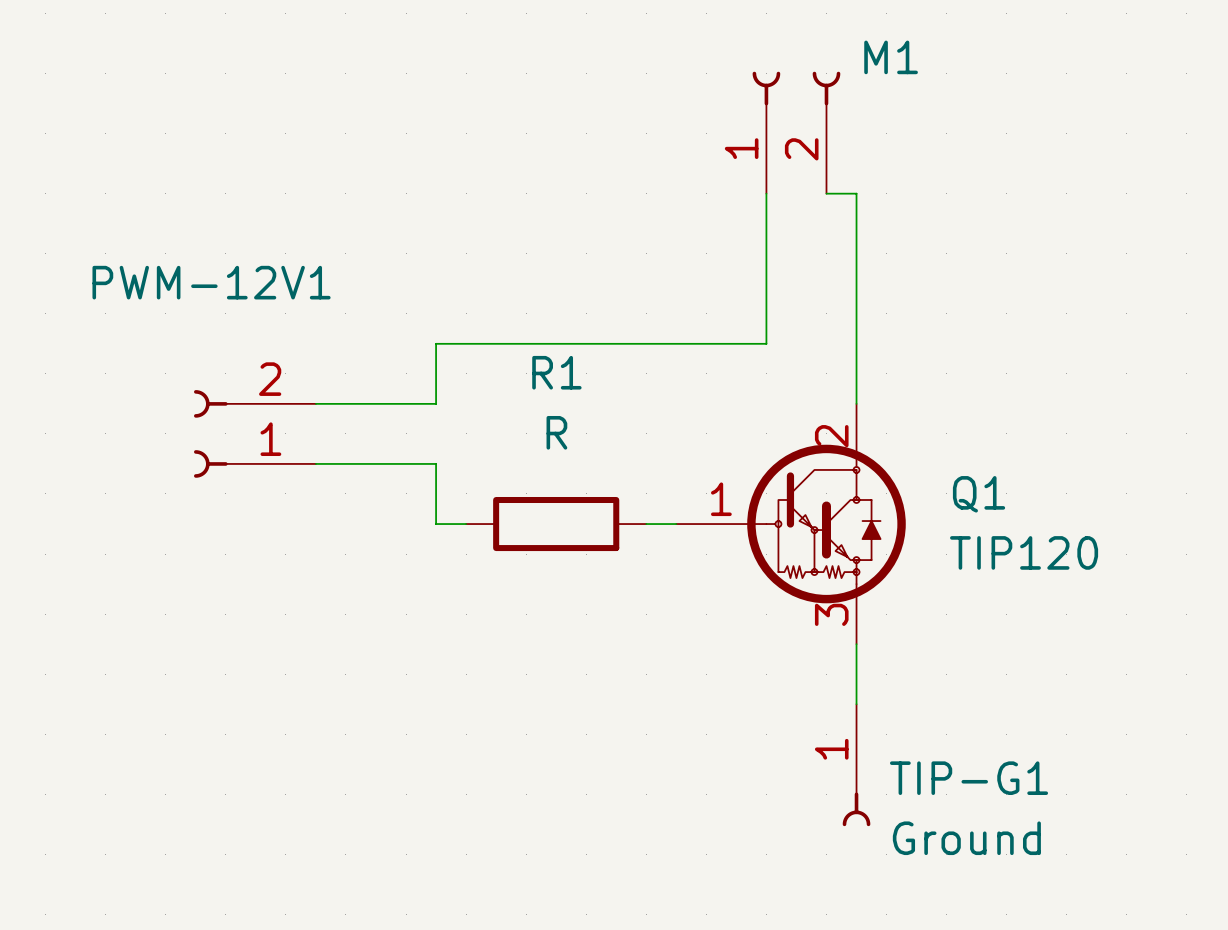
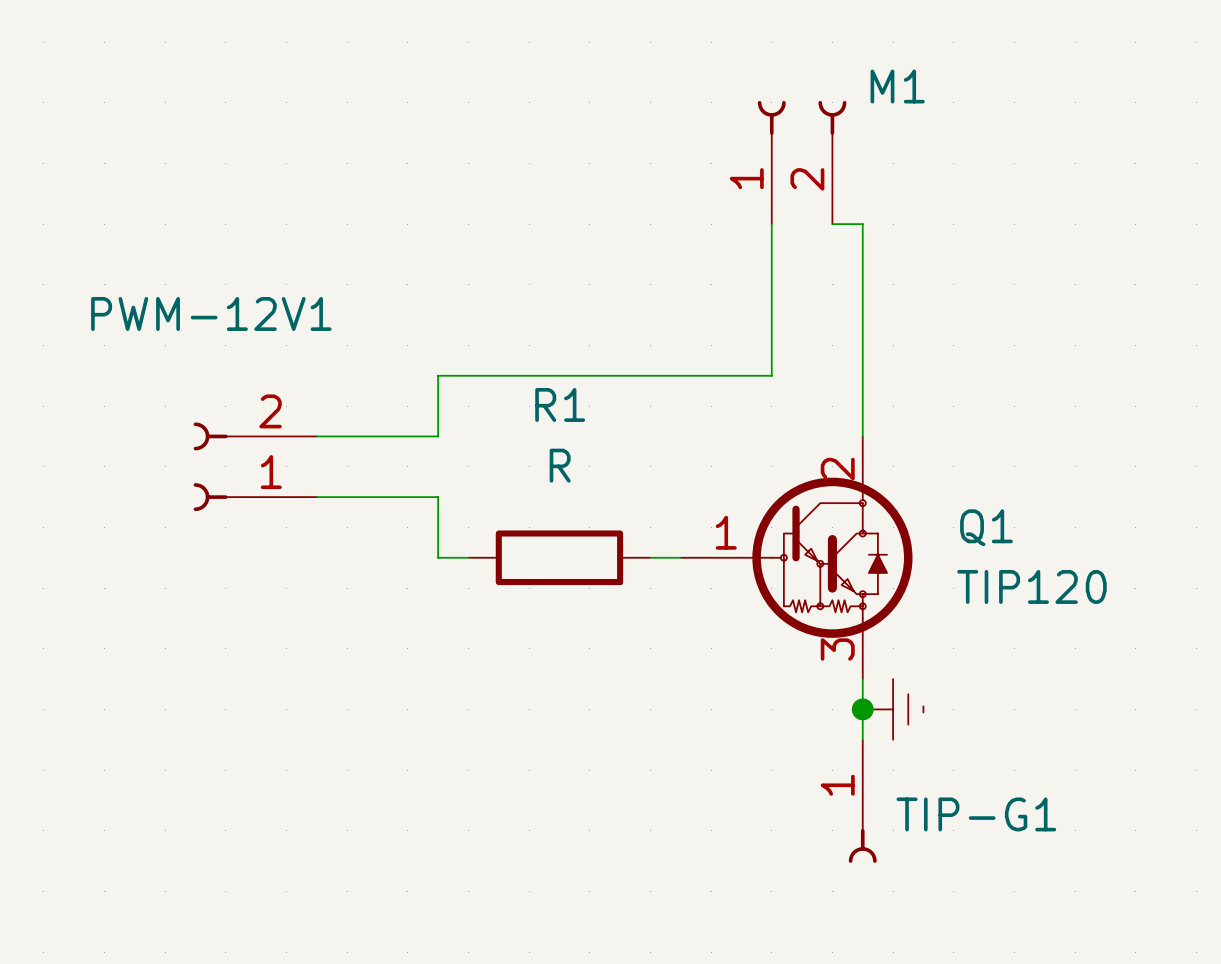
junction: none -> (862, 709)
power symbol: none -> (893, 709)
TIP-G1 value: Ground (966, 838) -> none

